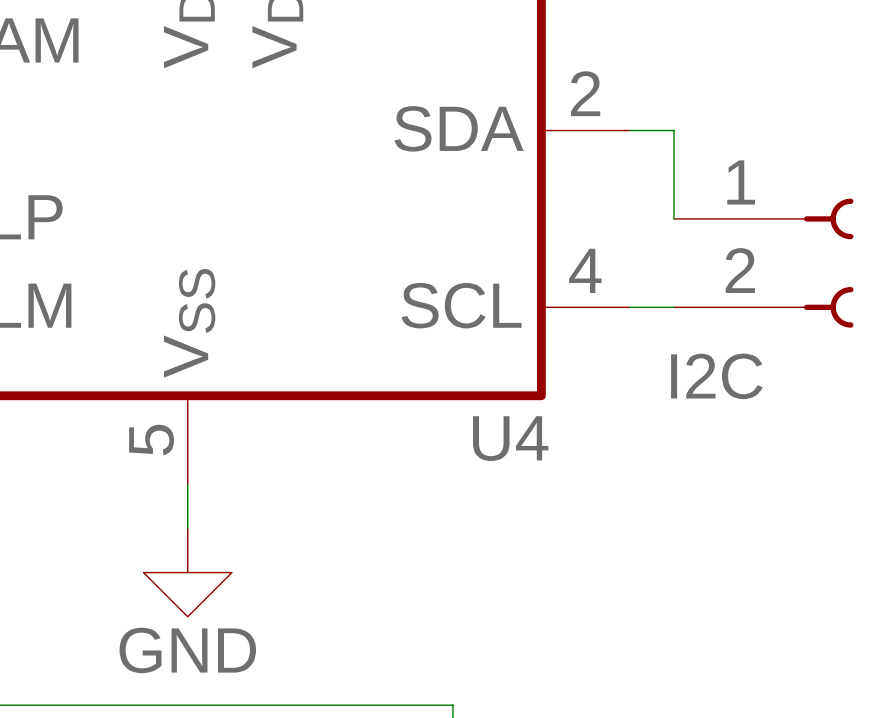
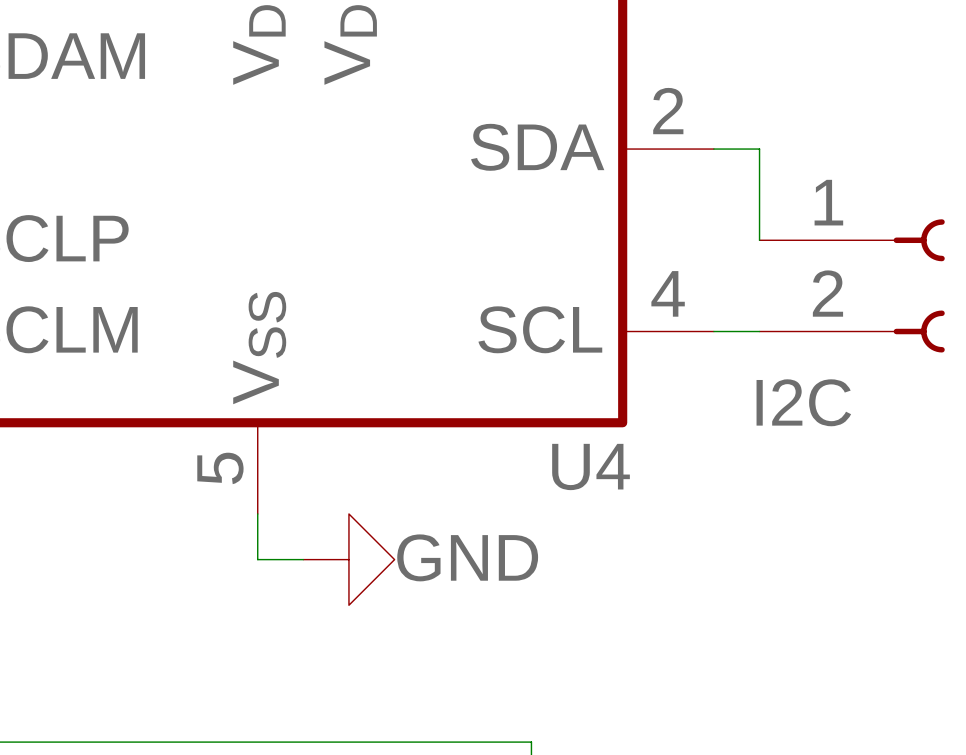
wire: none -> (257, 559) (303, 559)
power symbol rotation: 0° (187, 572) -> 90° counterclockwise (348, 559)
power symbol position: GND (187, 572) -> GND (348, 559)

